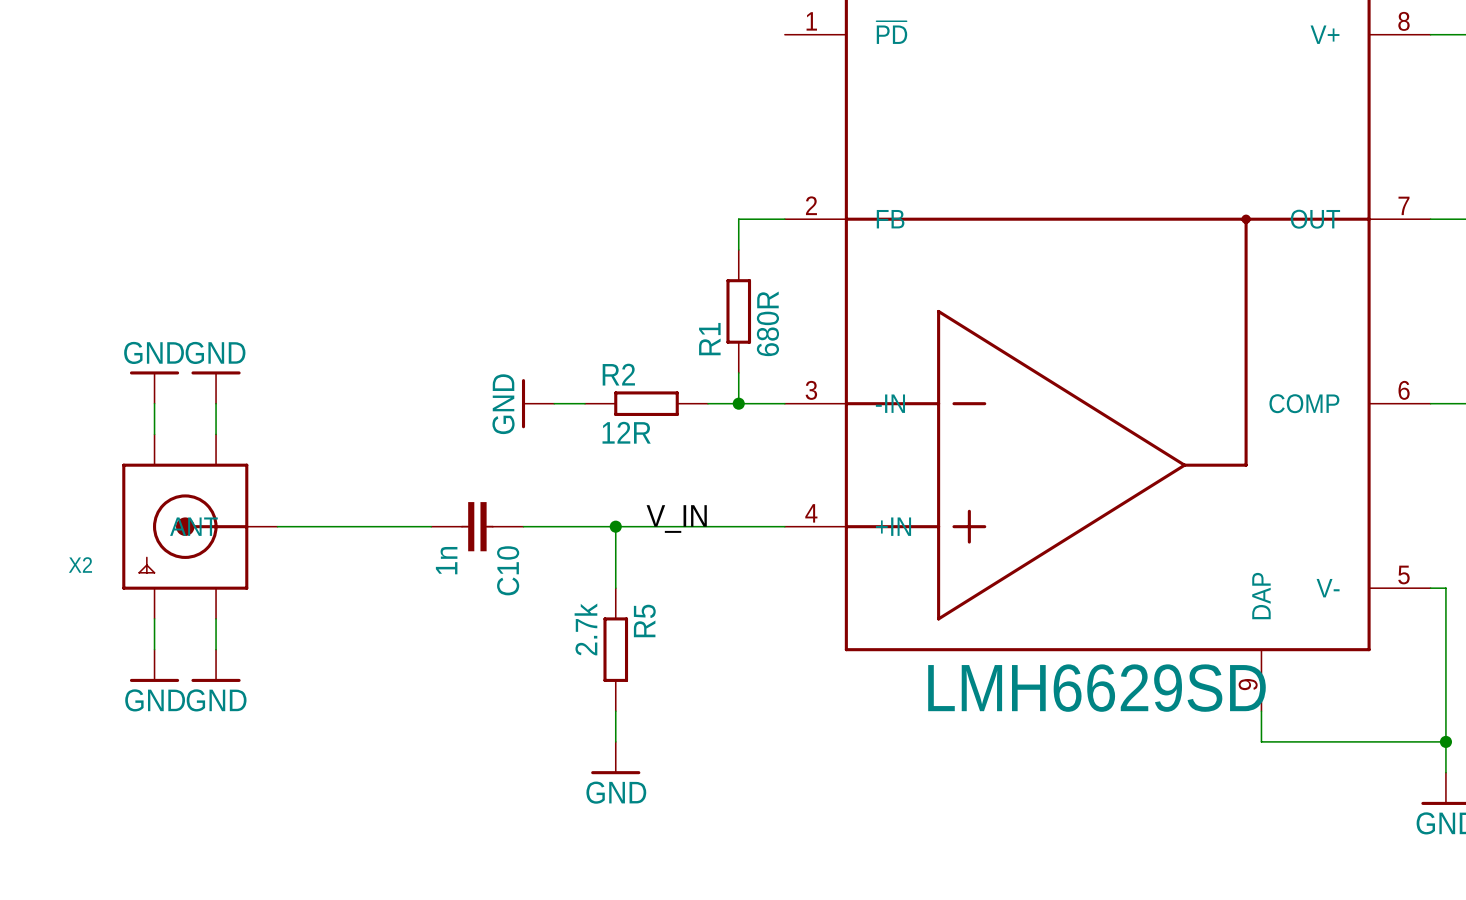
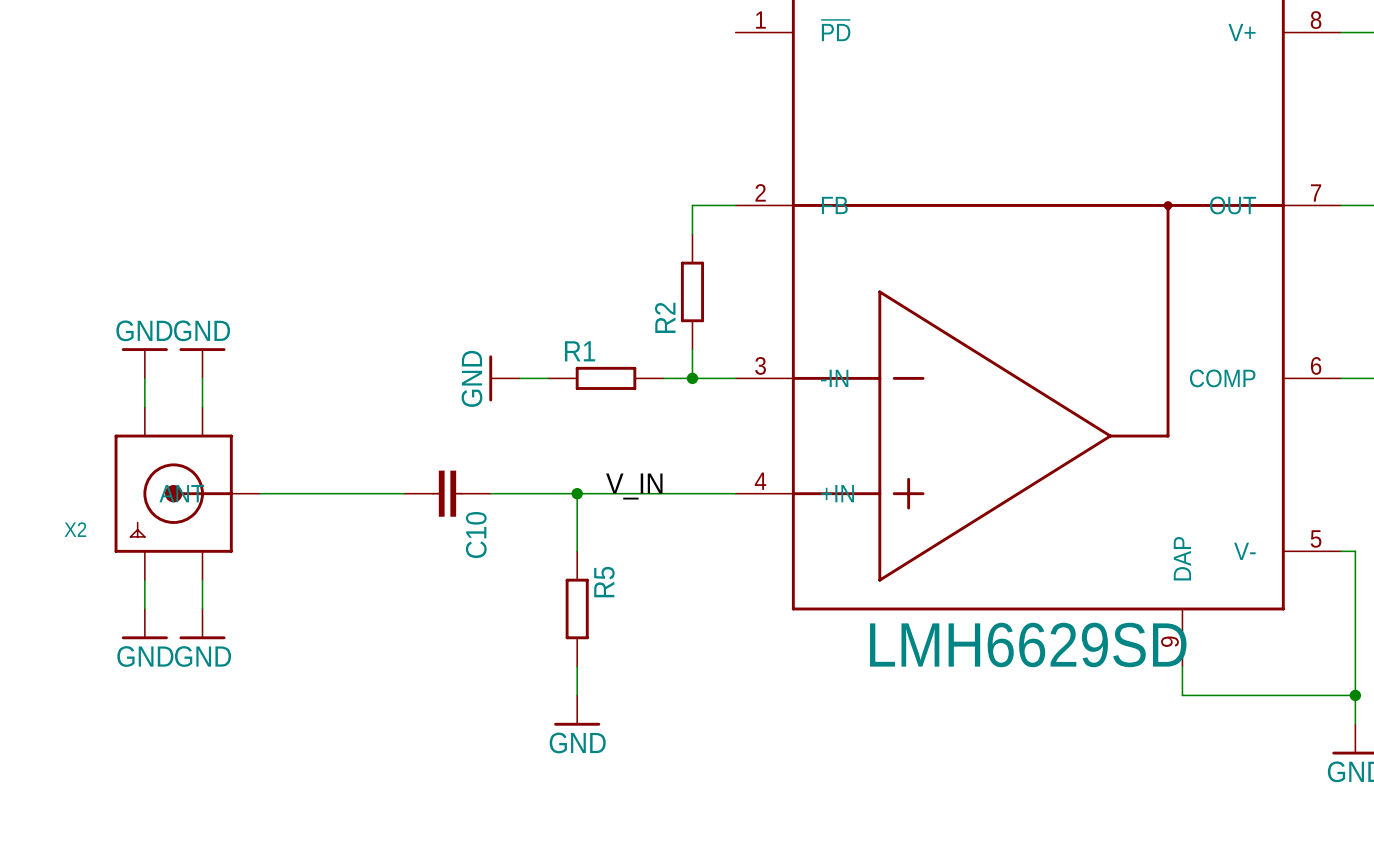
R1 value: 680R (767, 323) -> none
R1 name: R1 (709, 339) -> R2 (665, 317)
R2 name: R2 (618, 374) -> R1 (580, 351)
R2 value: 12R (626, 432) -> none
C10 value: 1n (446, 560) -> none
R5 value: 2.7k (585, 629) -> none

